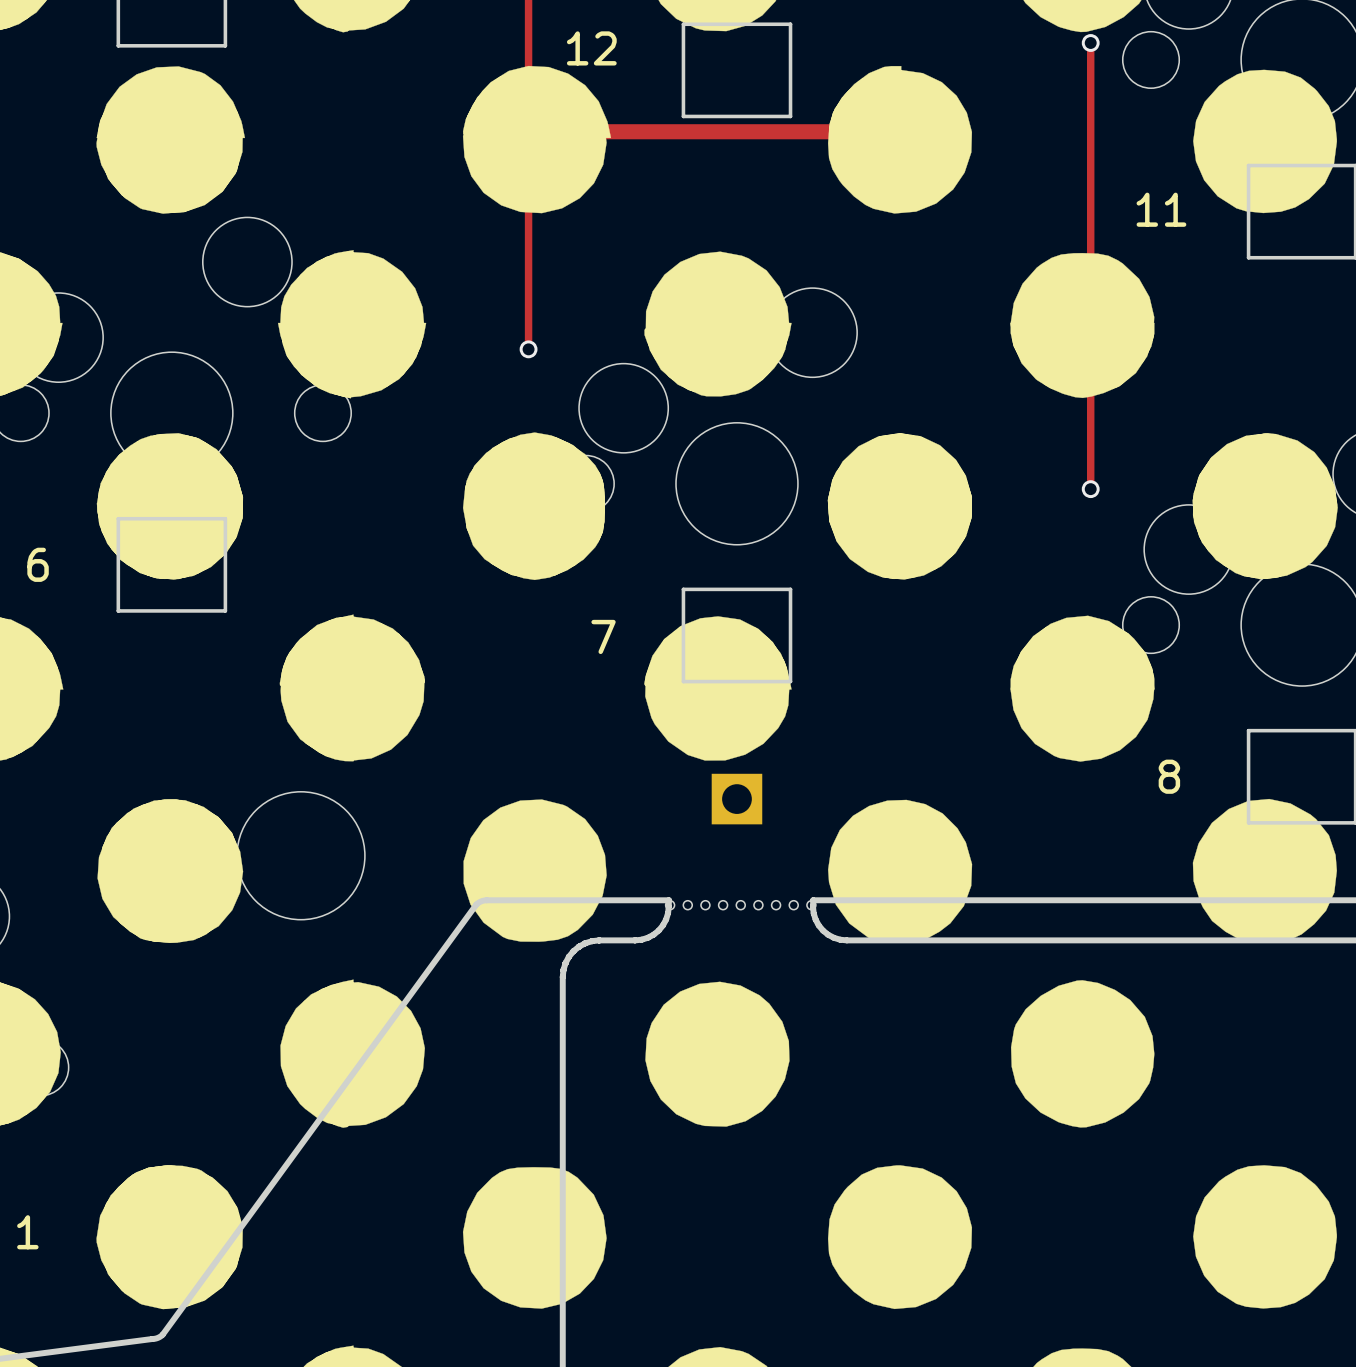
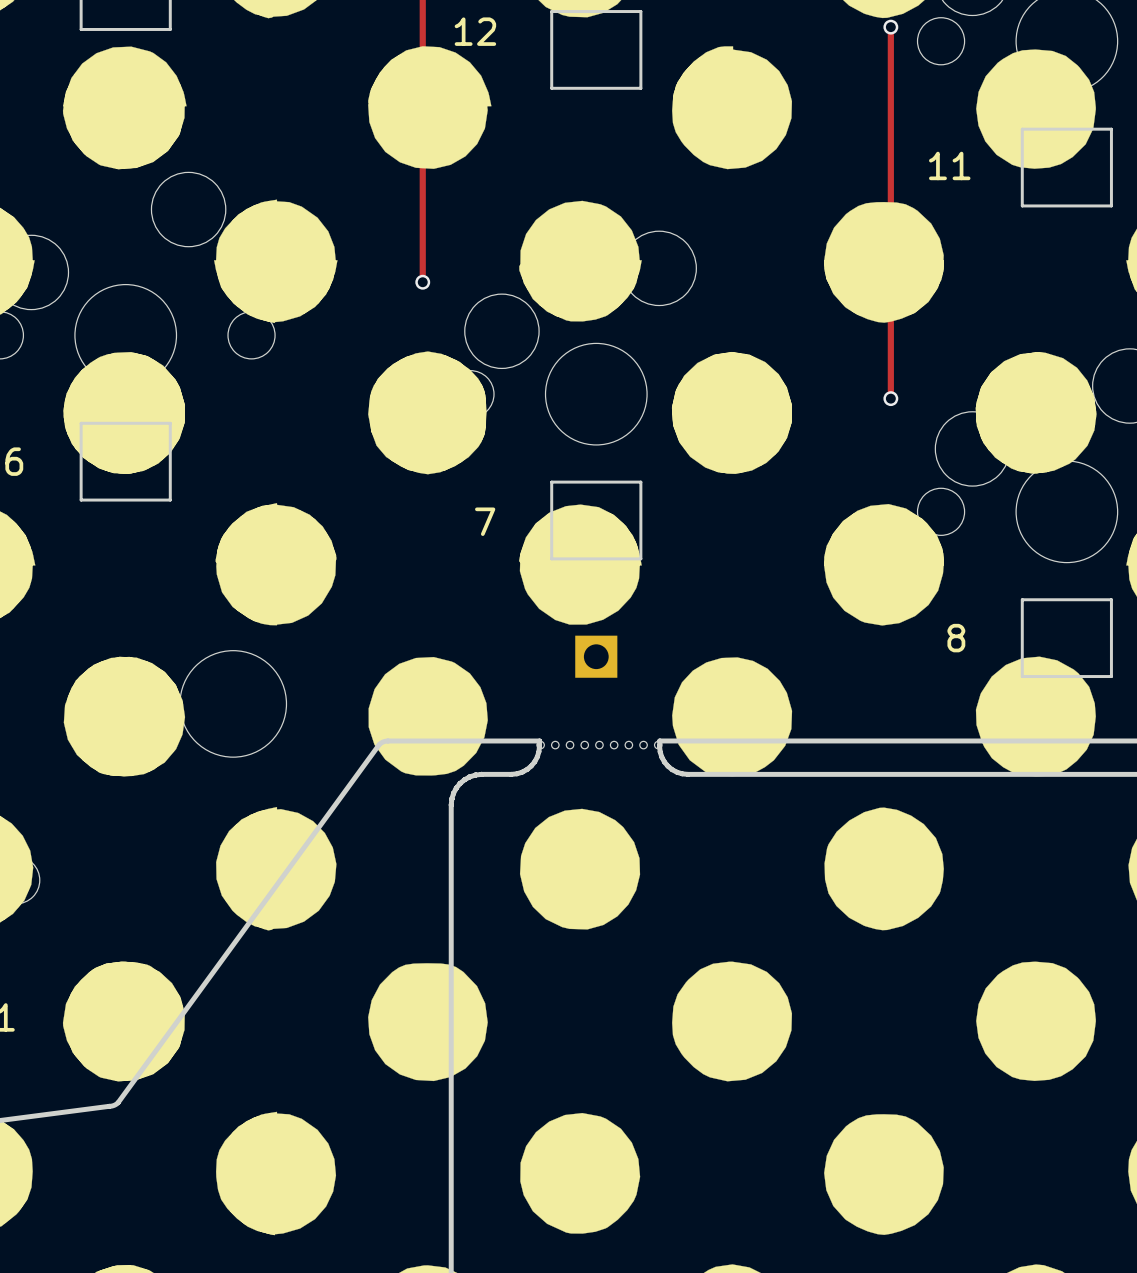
track: (568, 115) (585, 131) (883, 131) (897, 145) -> none

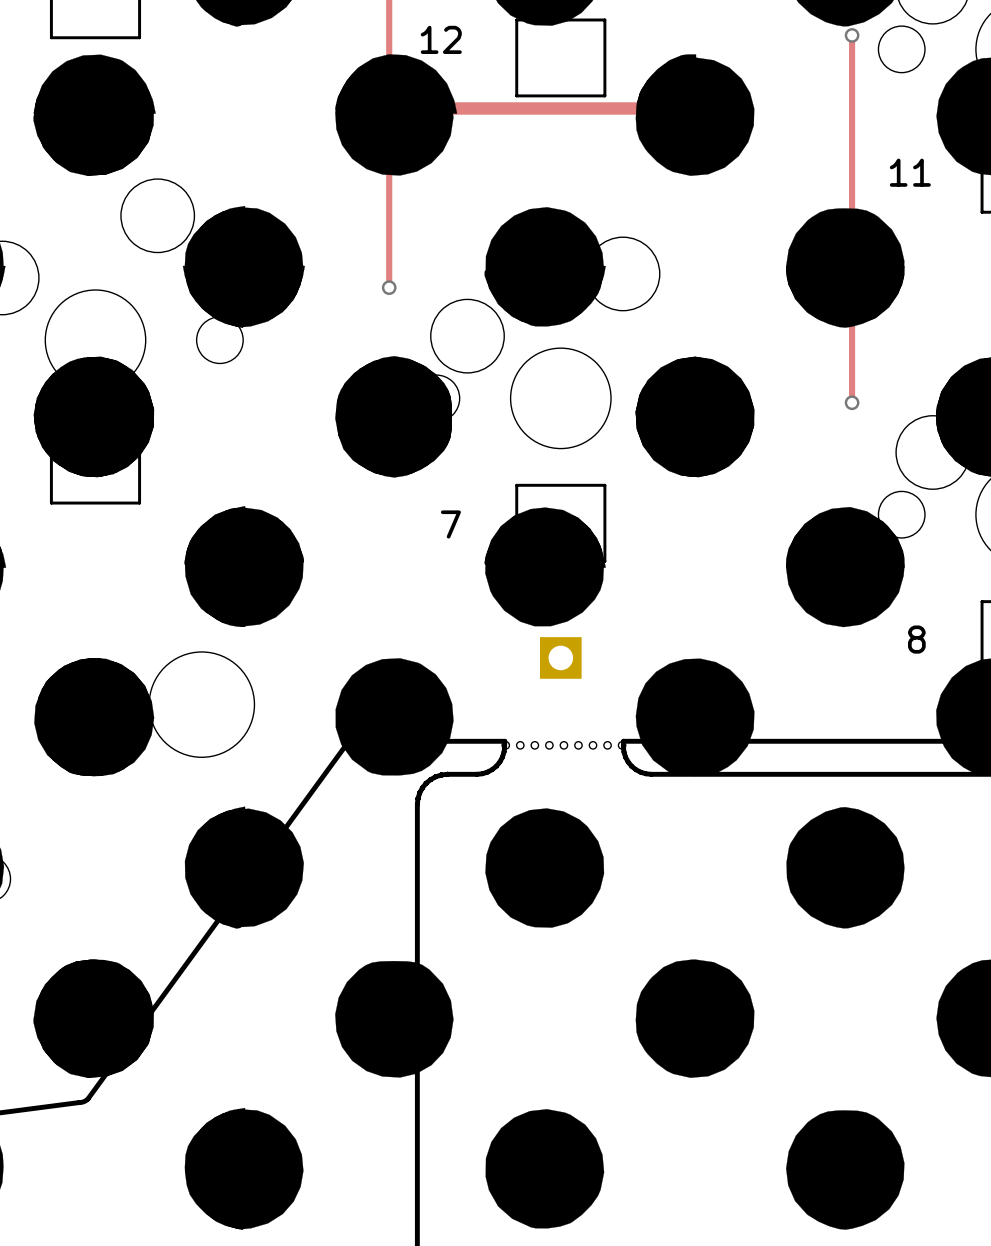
track: none -> (424, 94) (438, 108) (680, 108)

